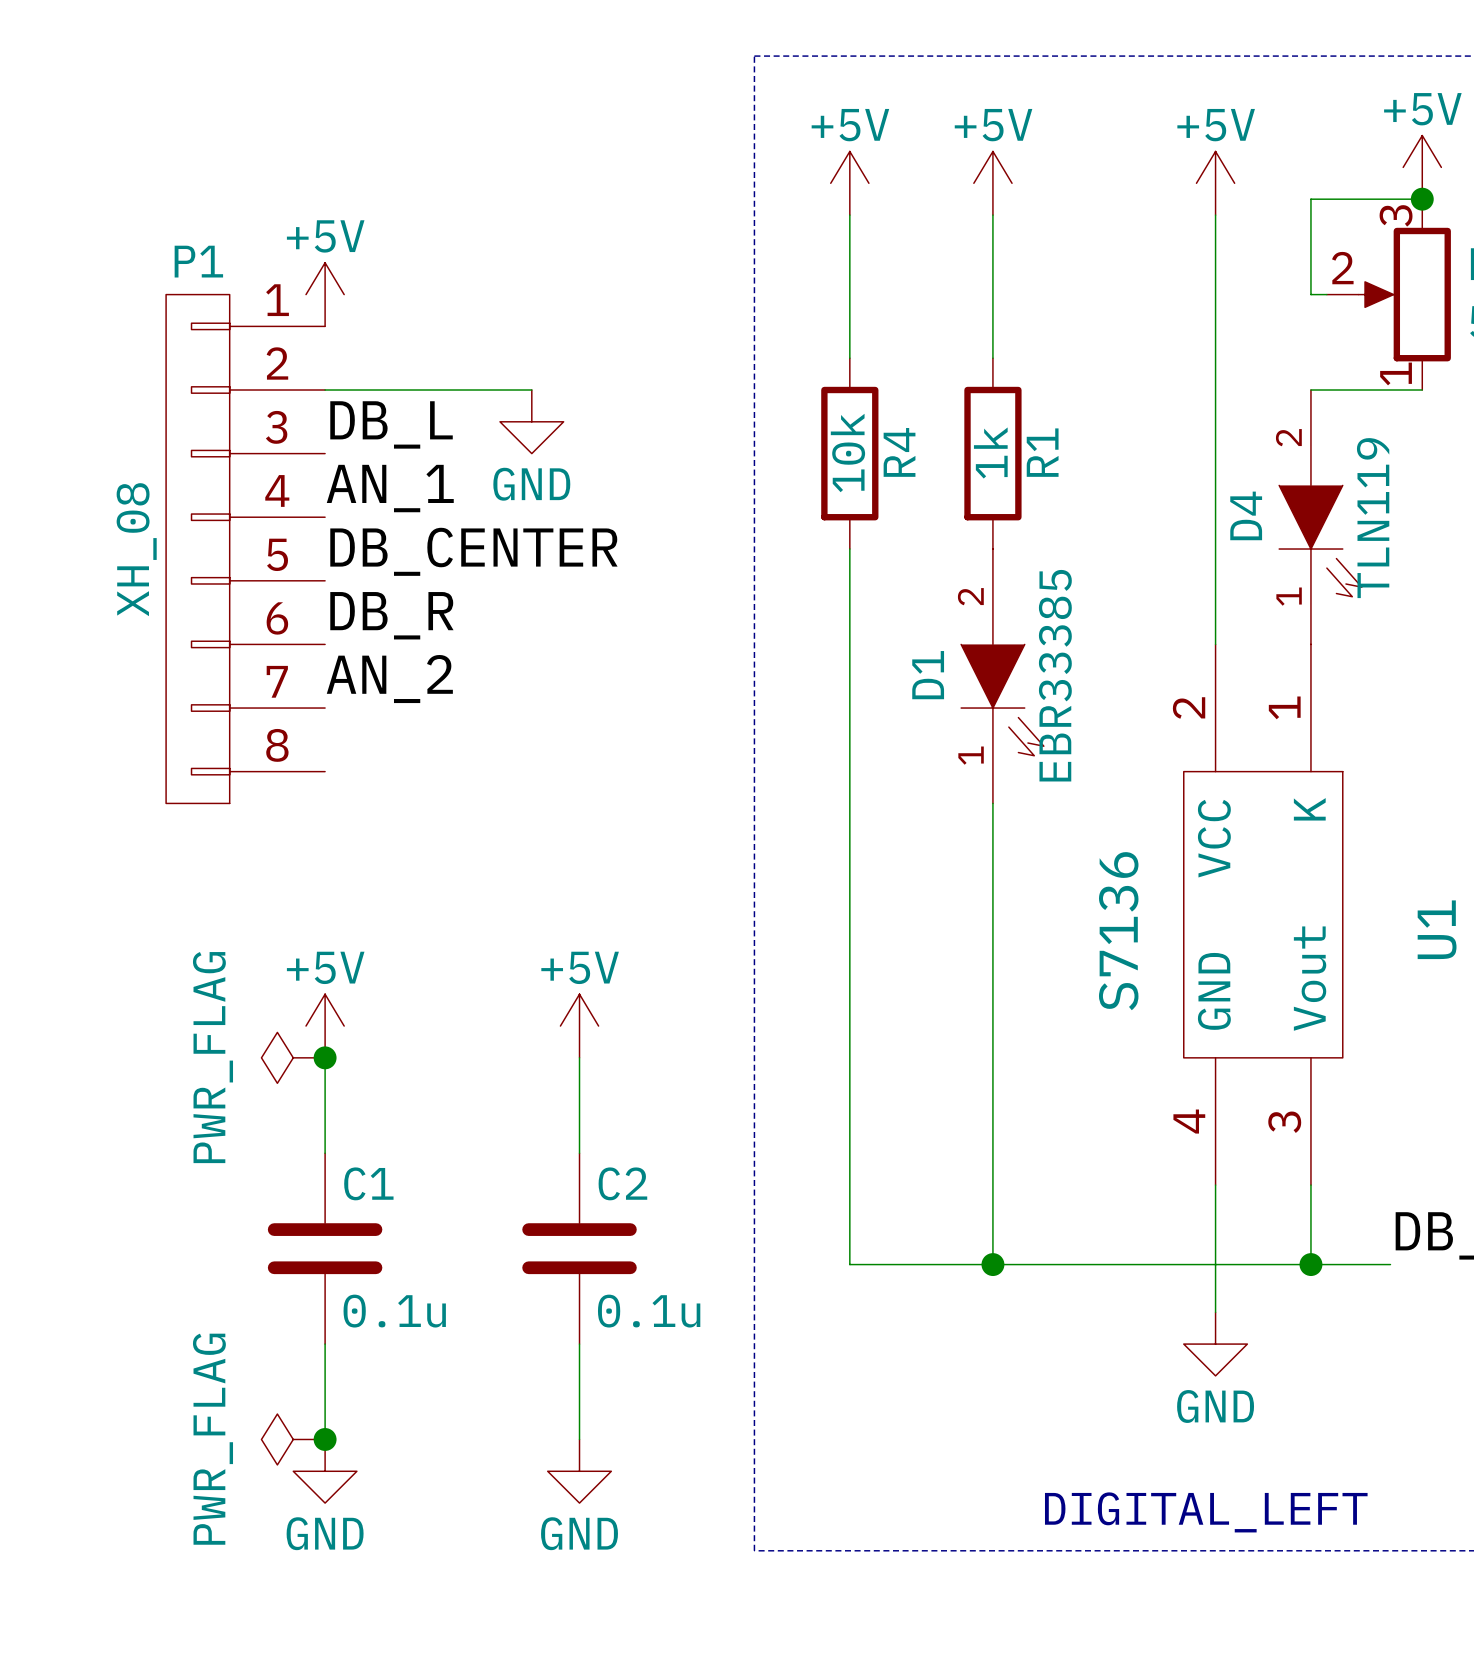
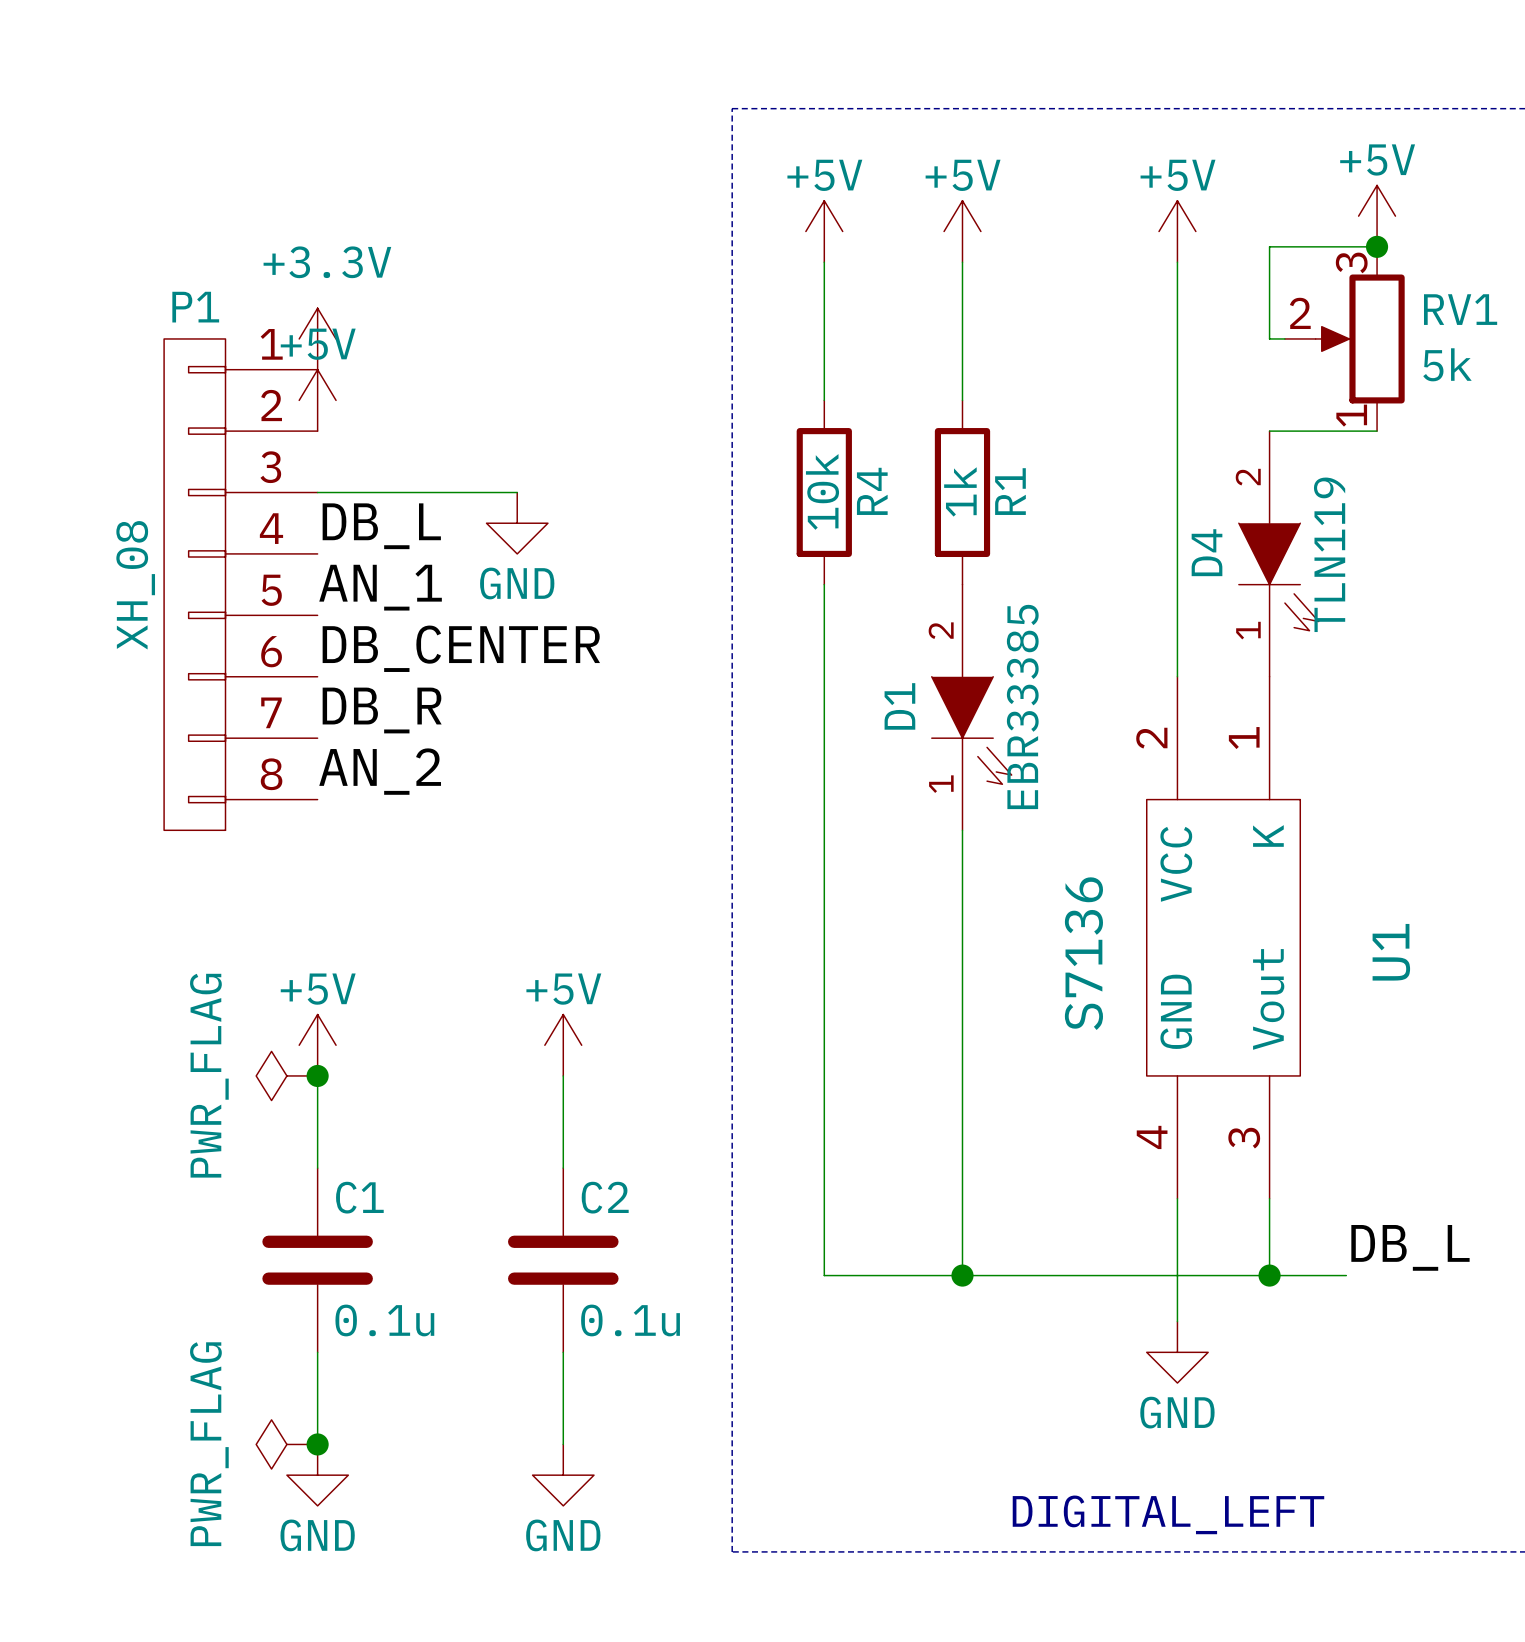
power symbol: +5V (325, 294) -> +3.3V (317, 338)
power symbol: none -> +5V (317, 400)
wire: (325, 390) (531, 390) -> (317, 492) (517, 492)
power symbol position: GND (531, 421) -> GND (517, 523)
label: DB_L (391, 424) -> none
label: AN_1 (390, 488) -> DB_L (381, 526)
label: DB_CENTER (473, 551) -> AN_1 (380, 587)
label: DB_R (391, 615) -> DB_CENTER (461, 648)
label: AN_2 (389, 679) -> DB_R (382, 710)
label: none -> AN_2 (380, 771)

